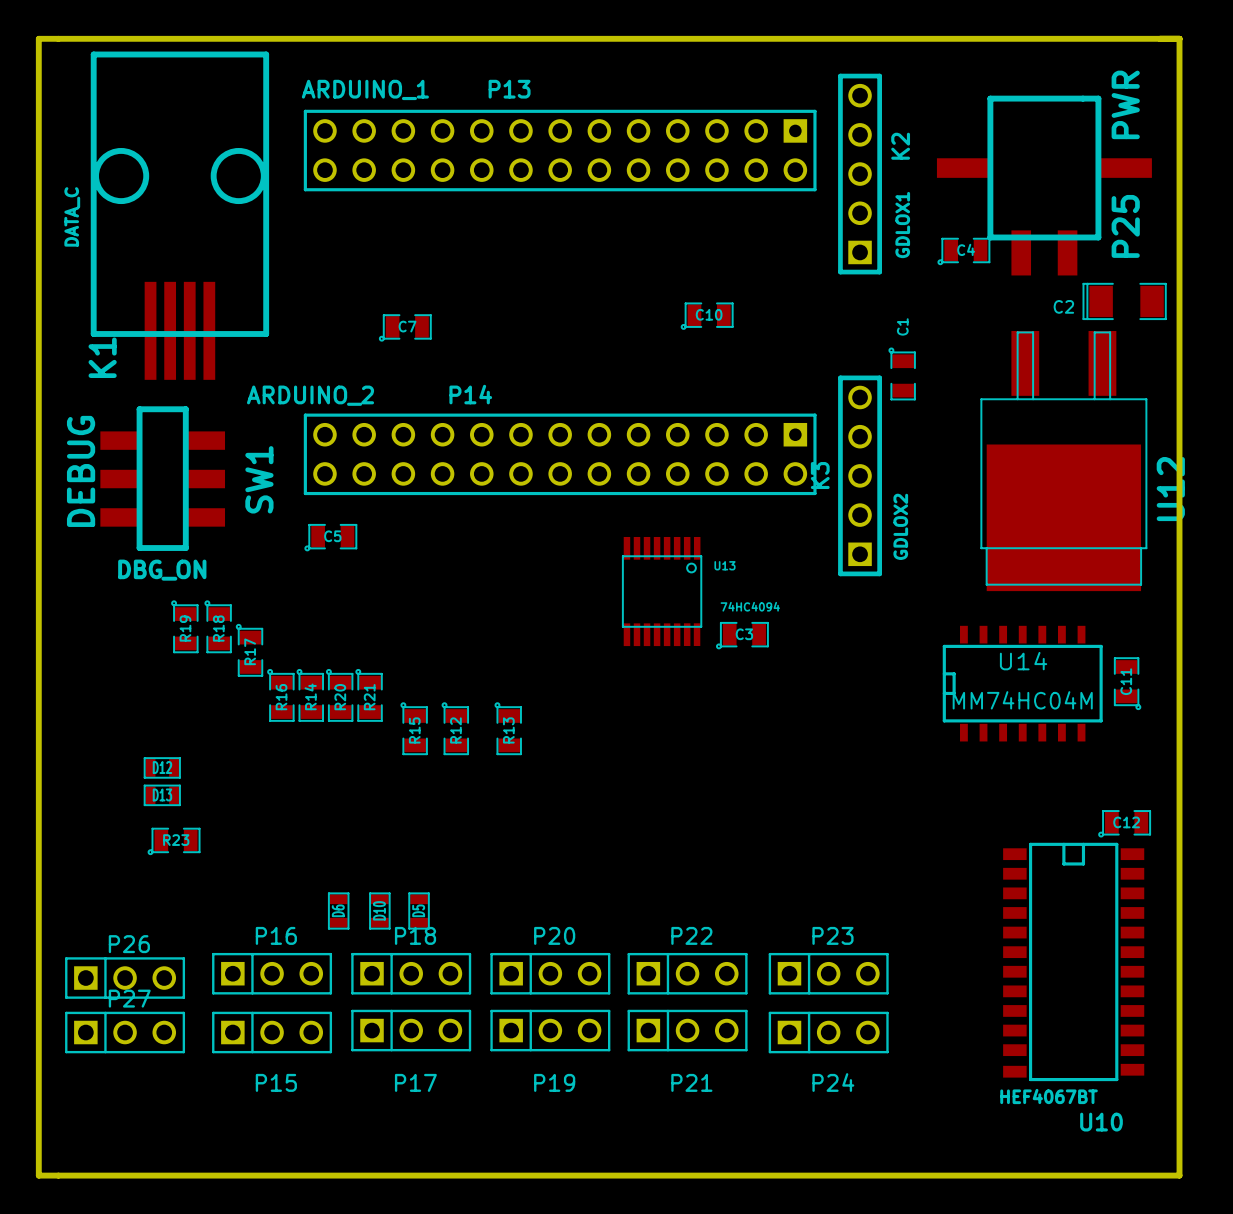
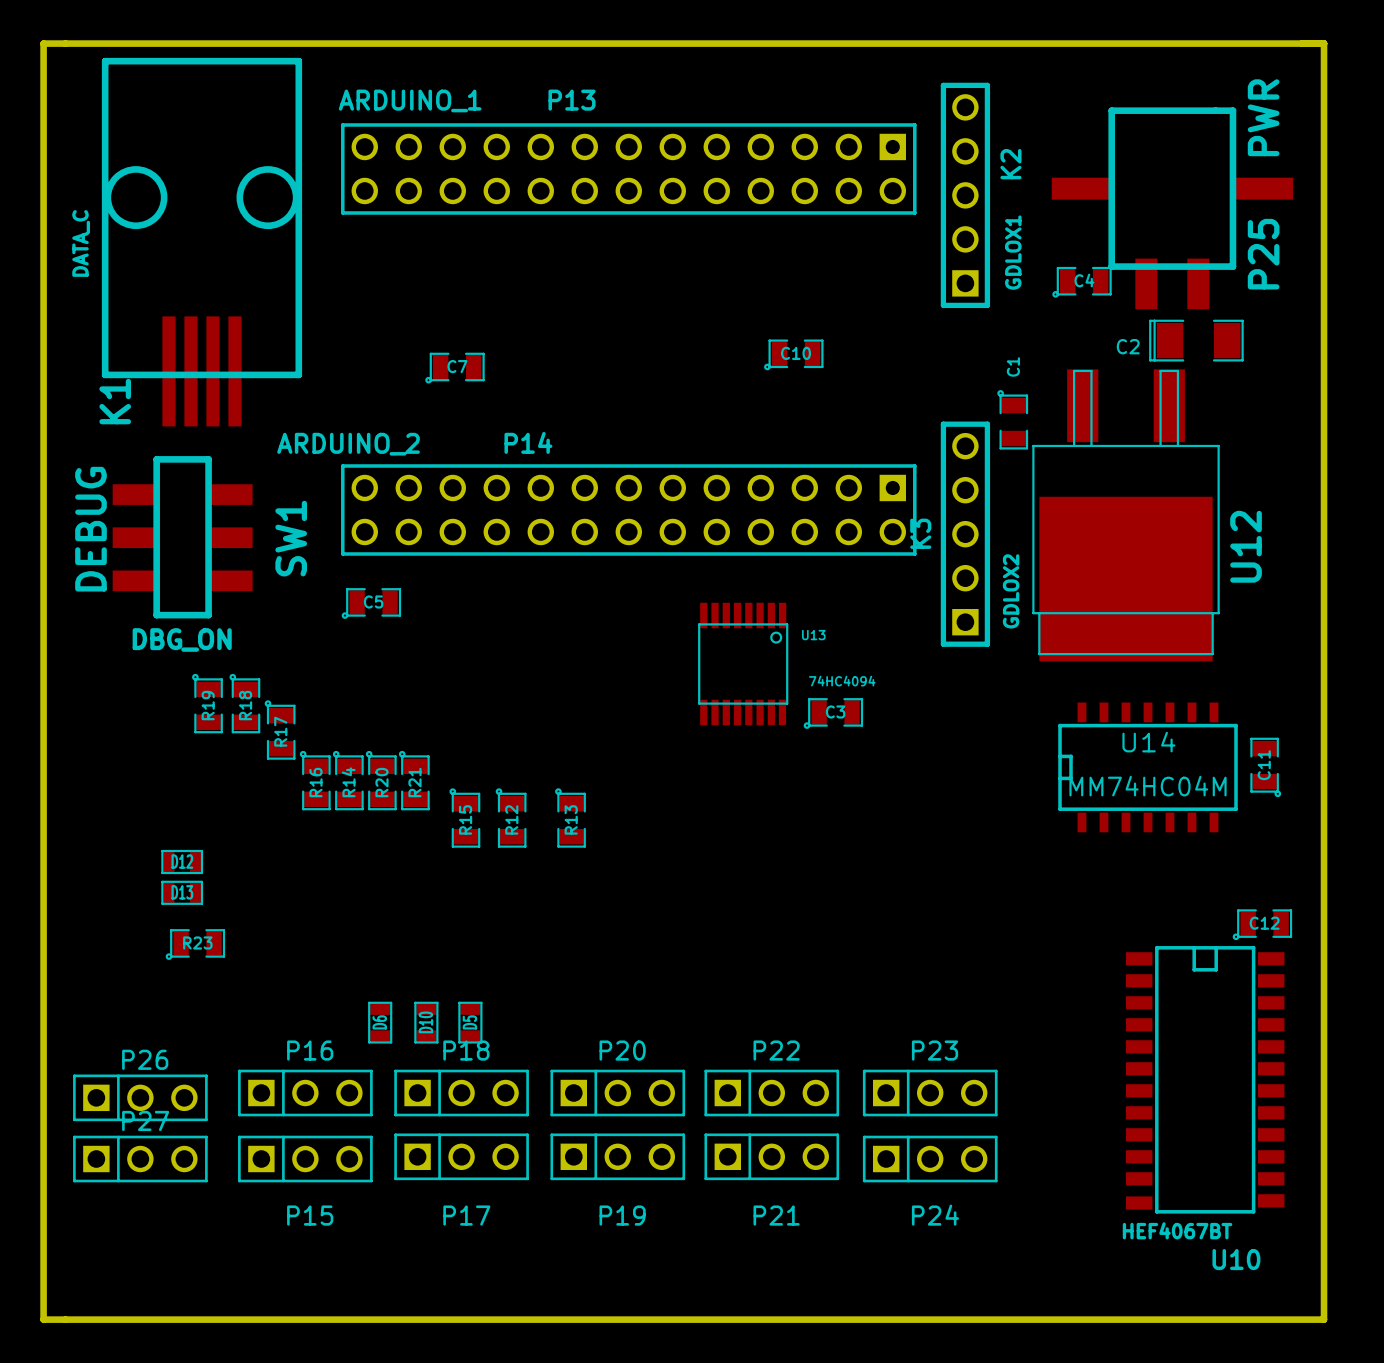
C2 position: (1124, 301) -> (1196, 340)
U12 position: (1063, 461) -> (1126, 515)

